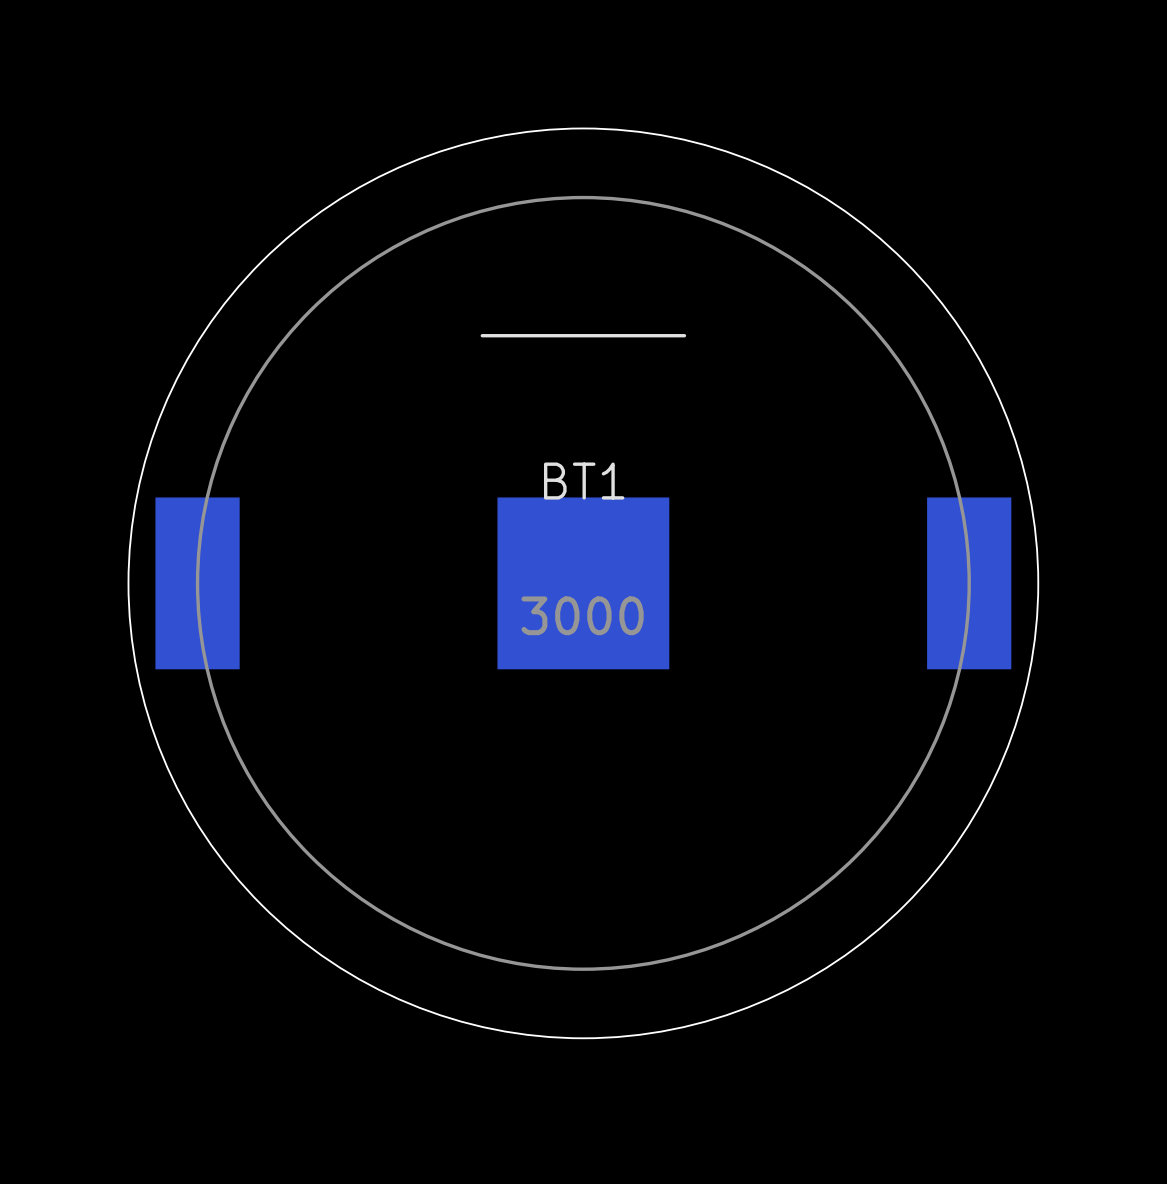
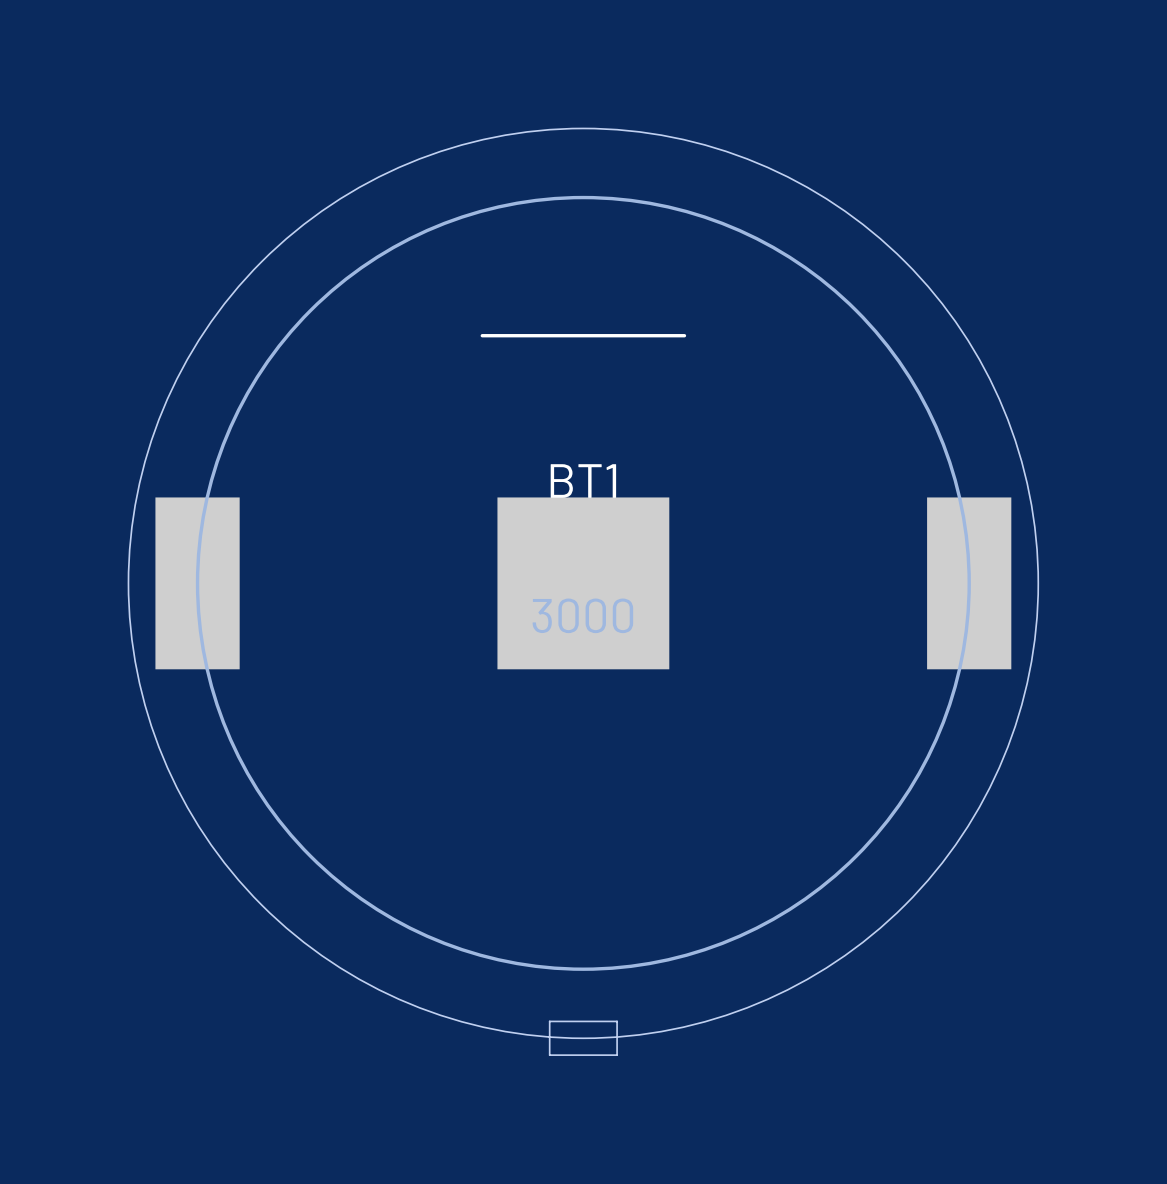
board edge: none -> (617, 1021) (549, 1021) (549, 1055) (617, 1055) (617, 1021)

